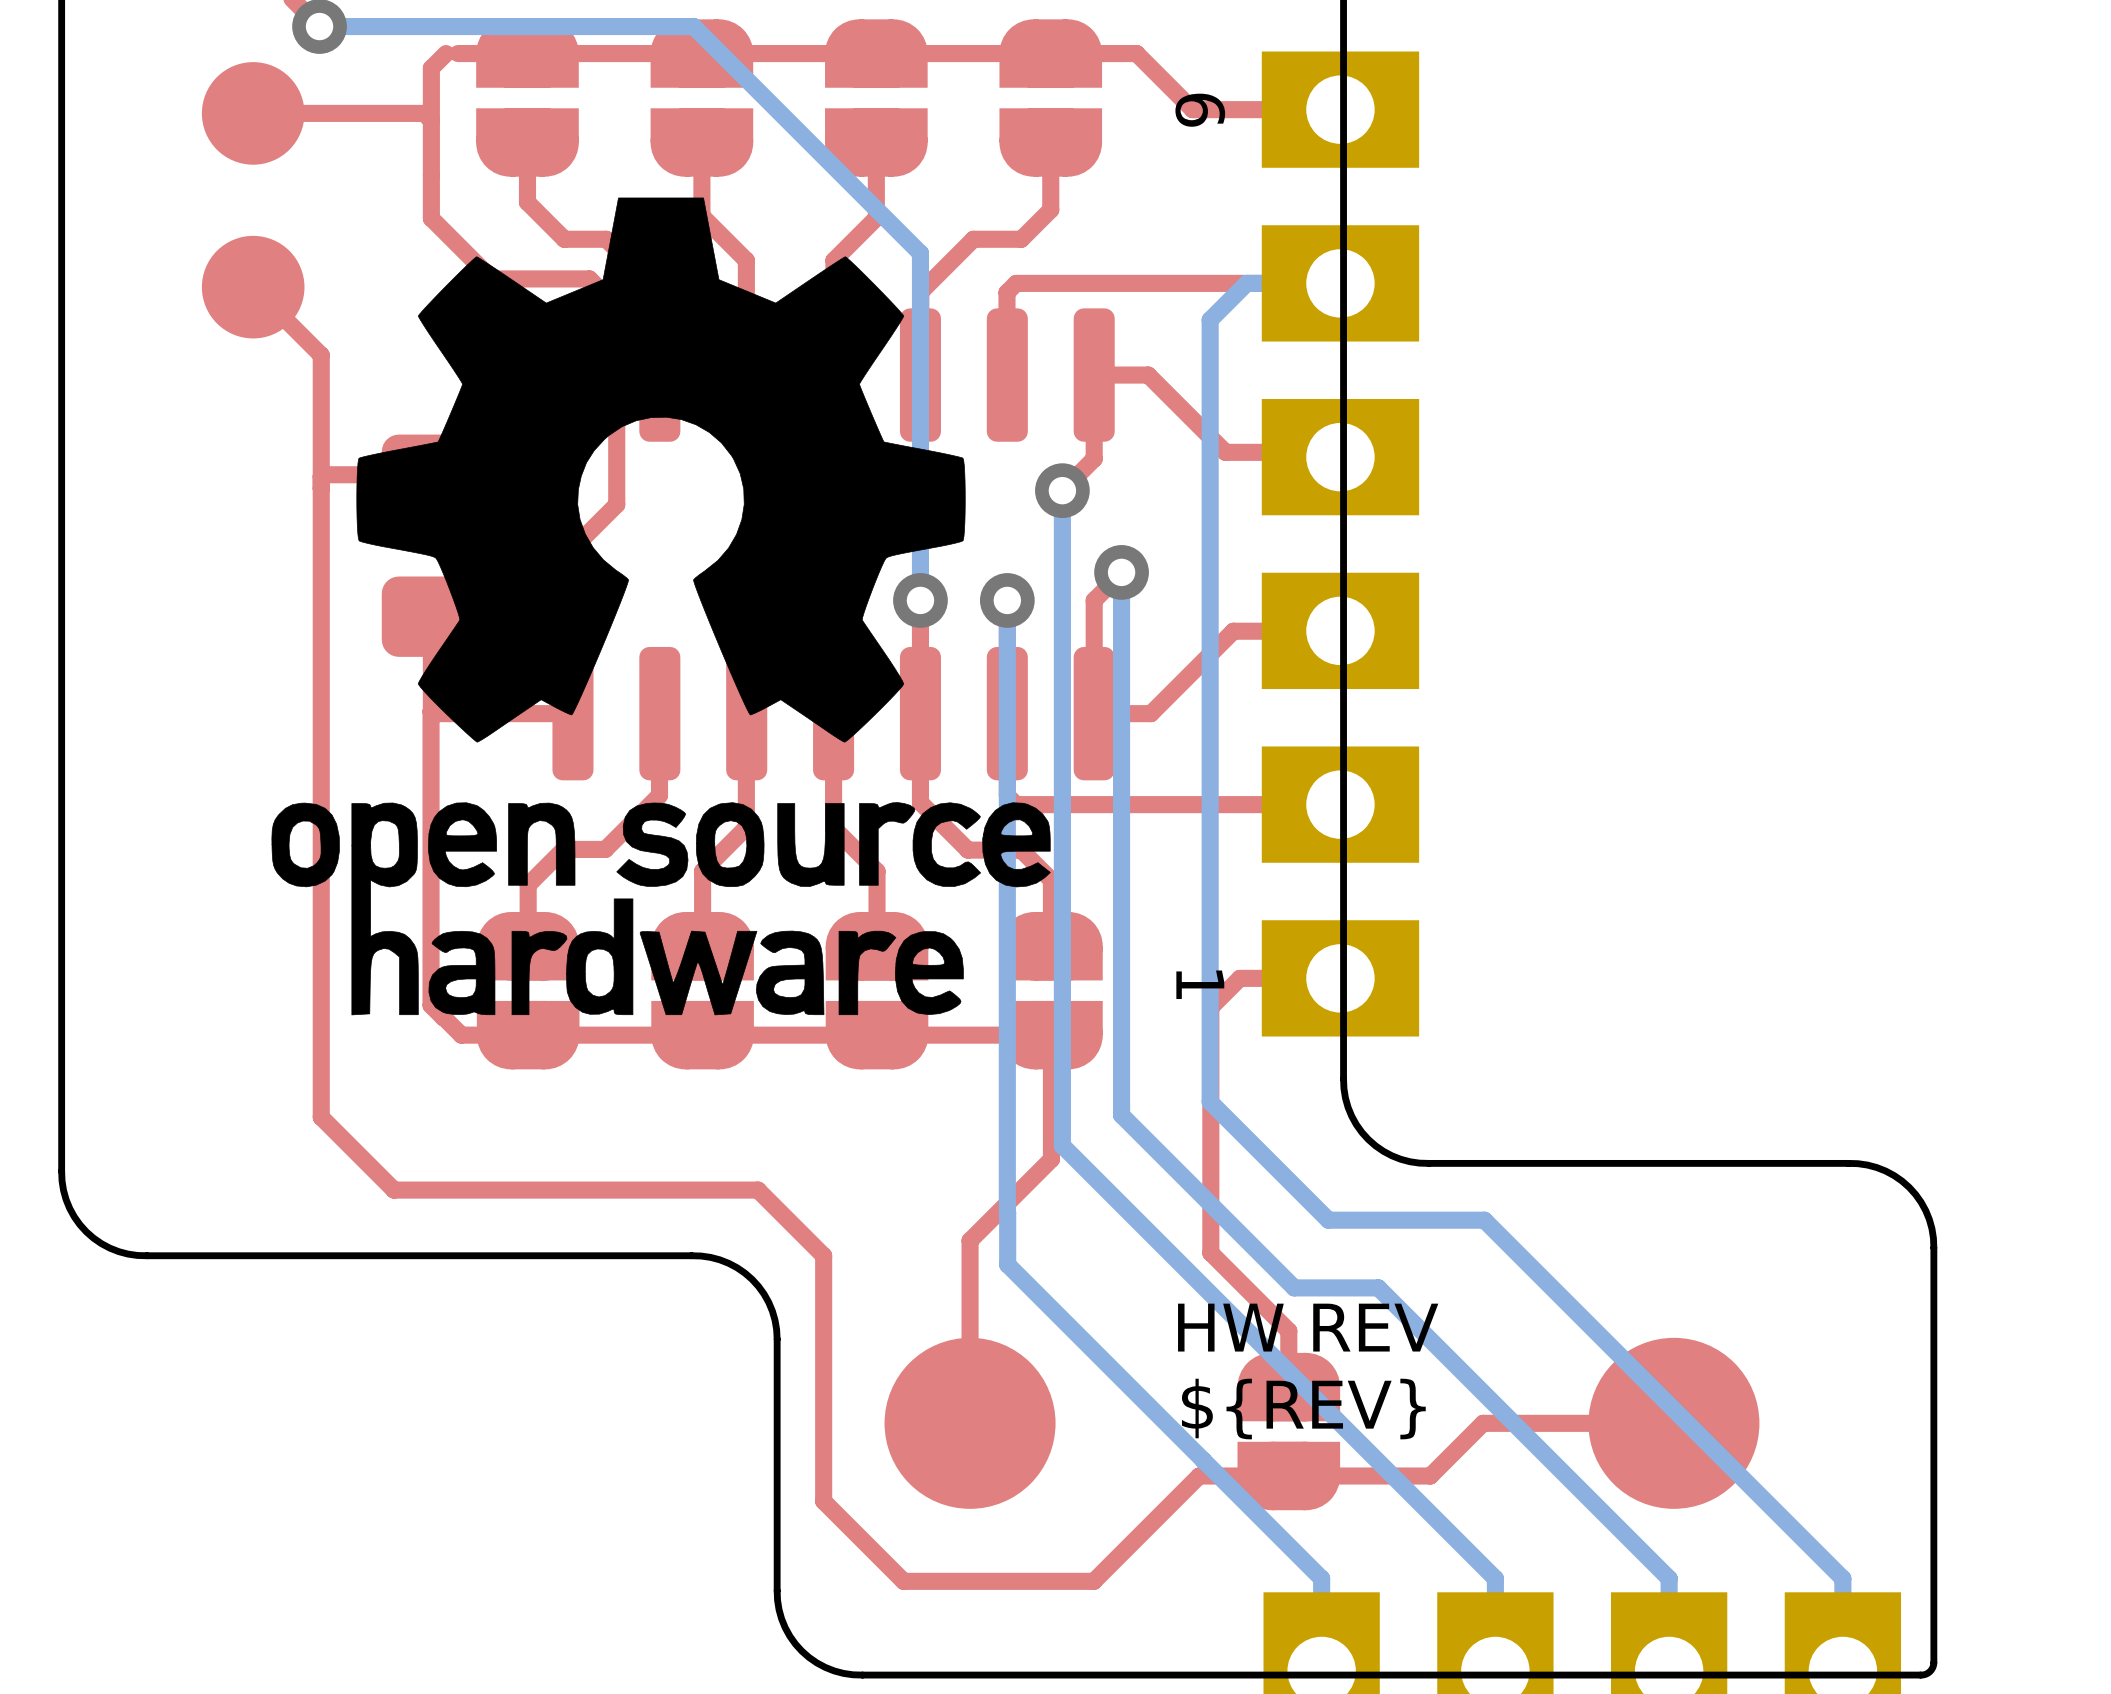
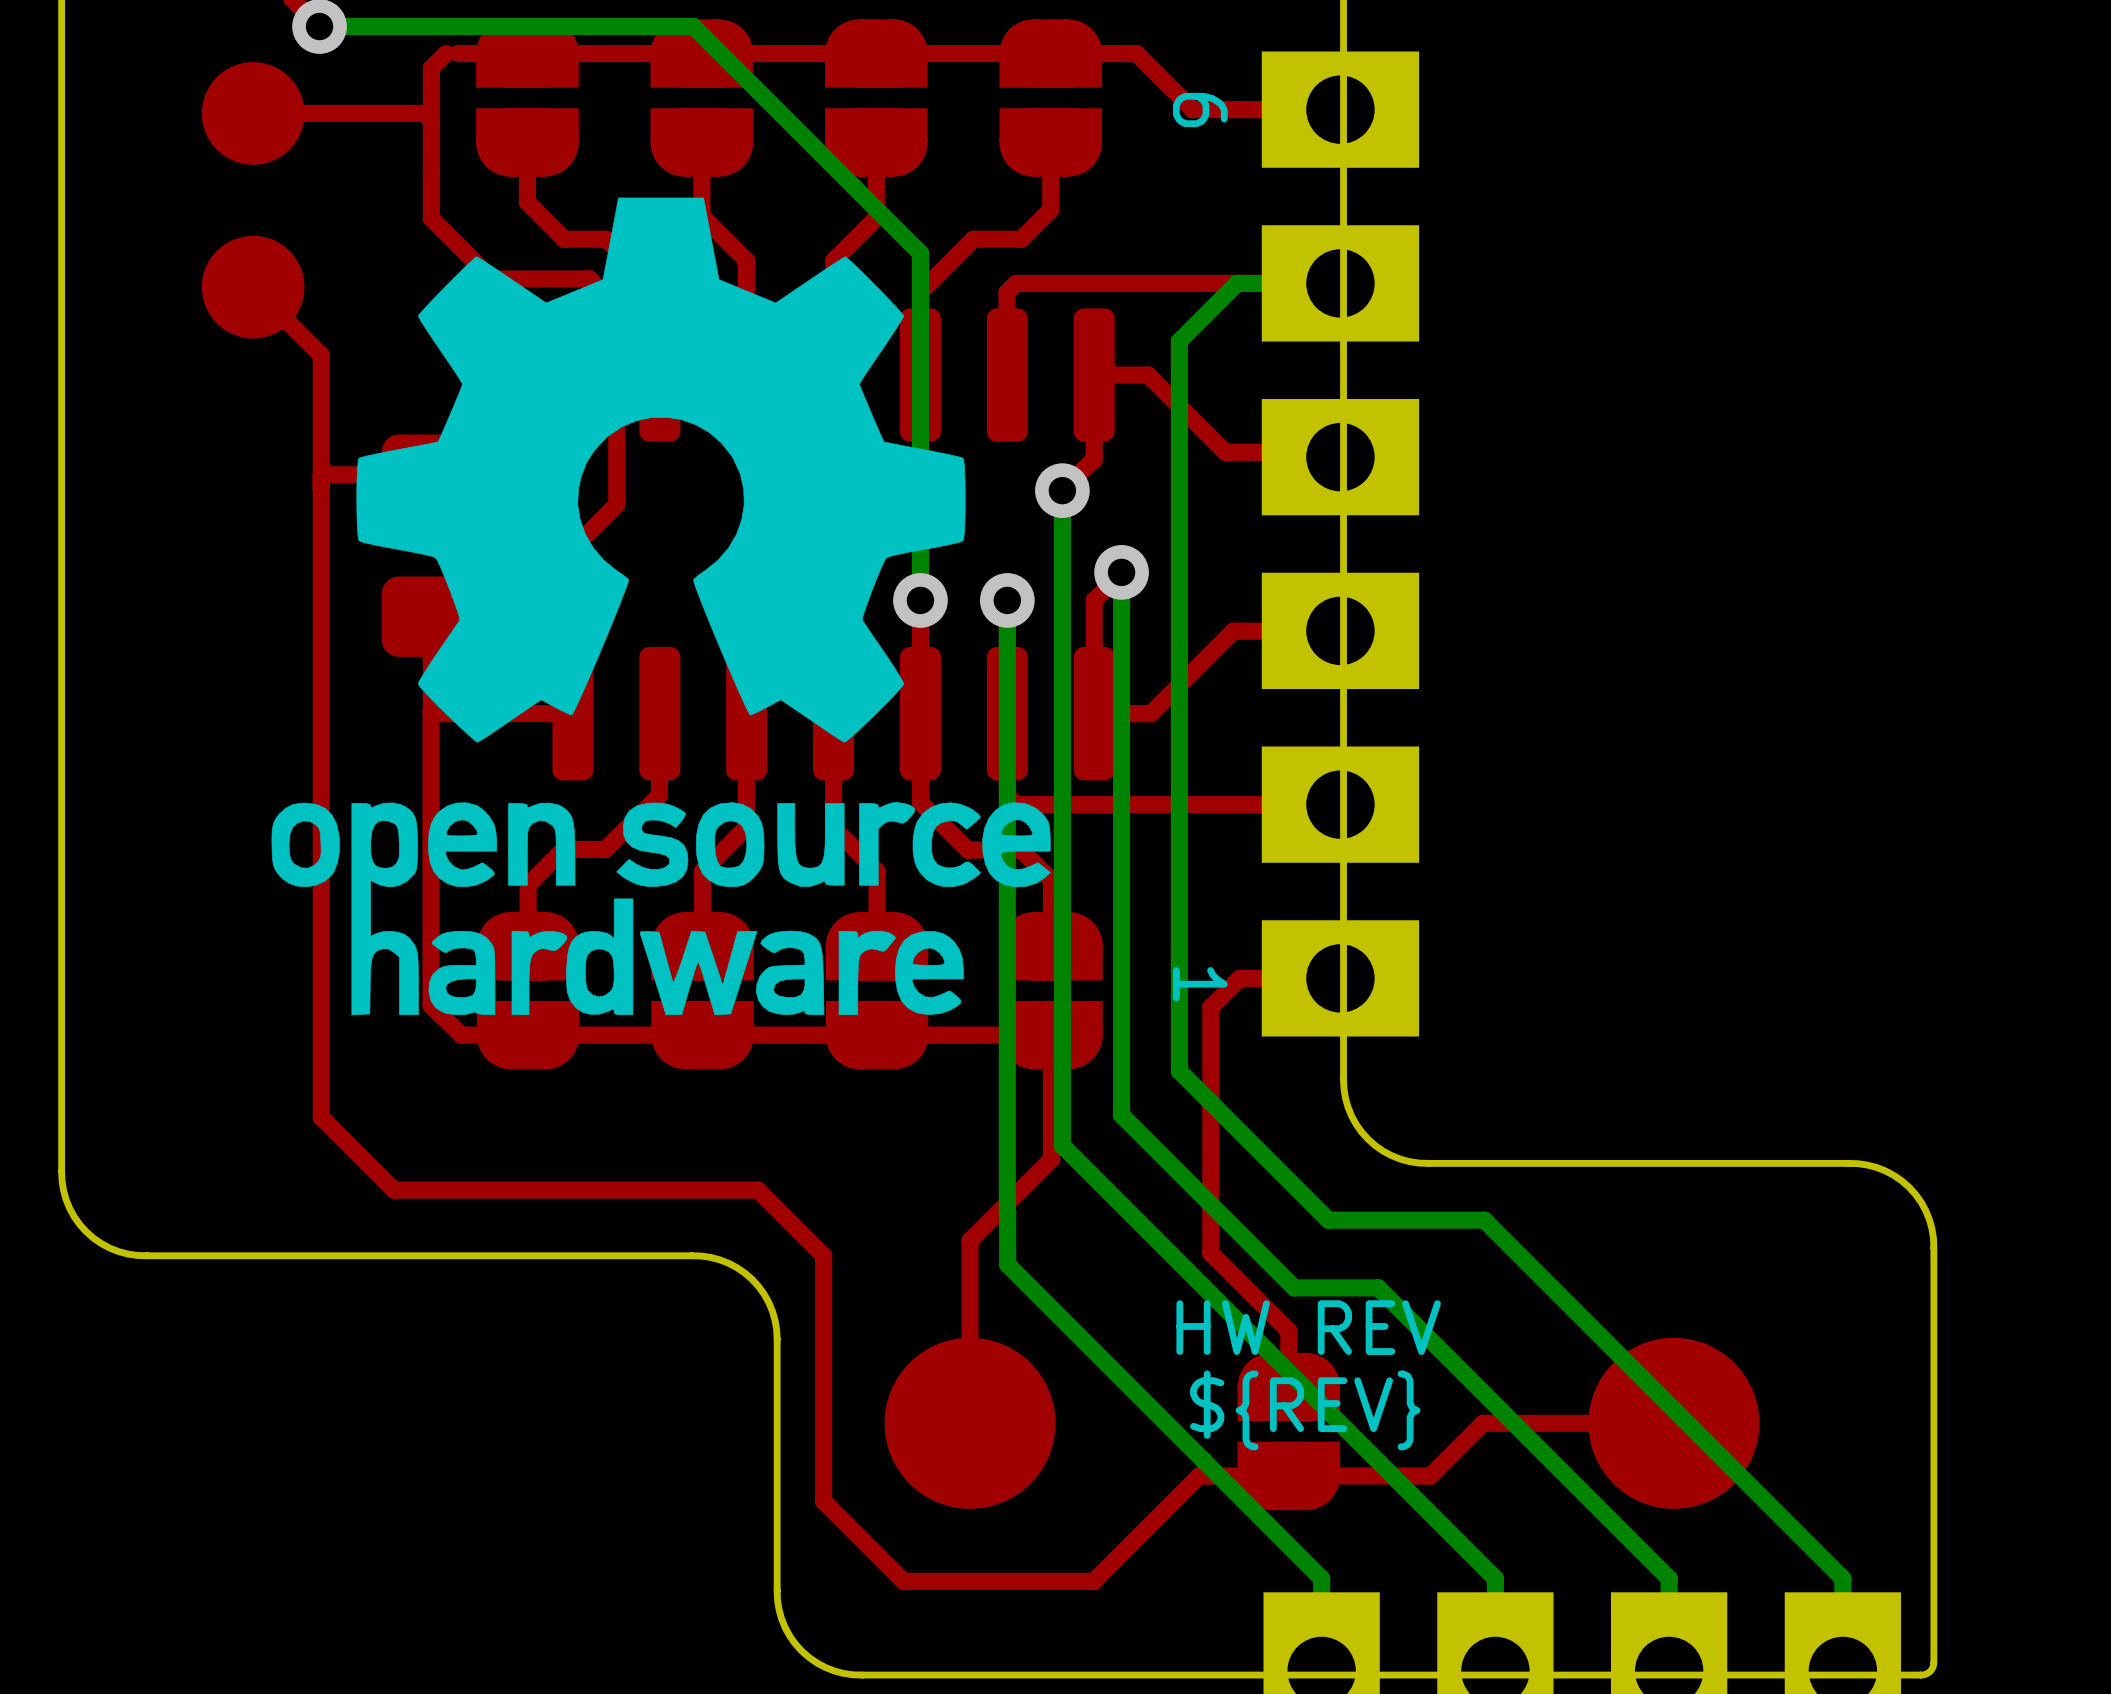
bottom track: (1246, 283) (1210, 319) (1210, 1101) -> (1246, 283) (1237, 283) (1179, 341) (1179, 1071) (1210, 1101)

